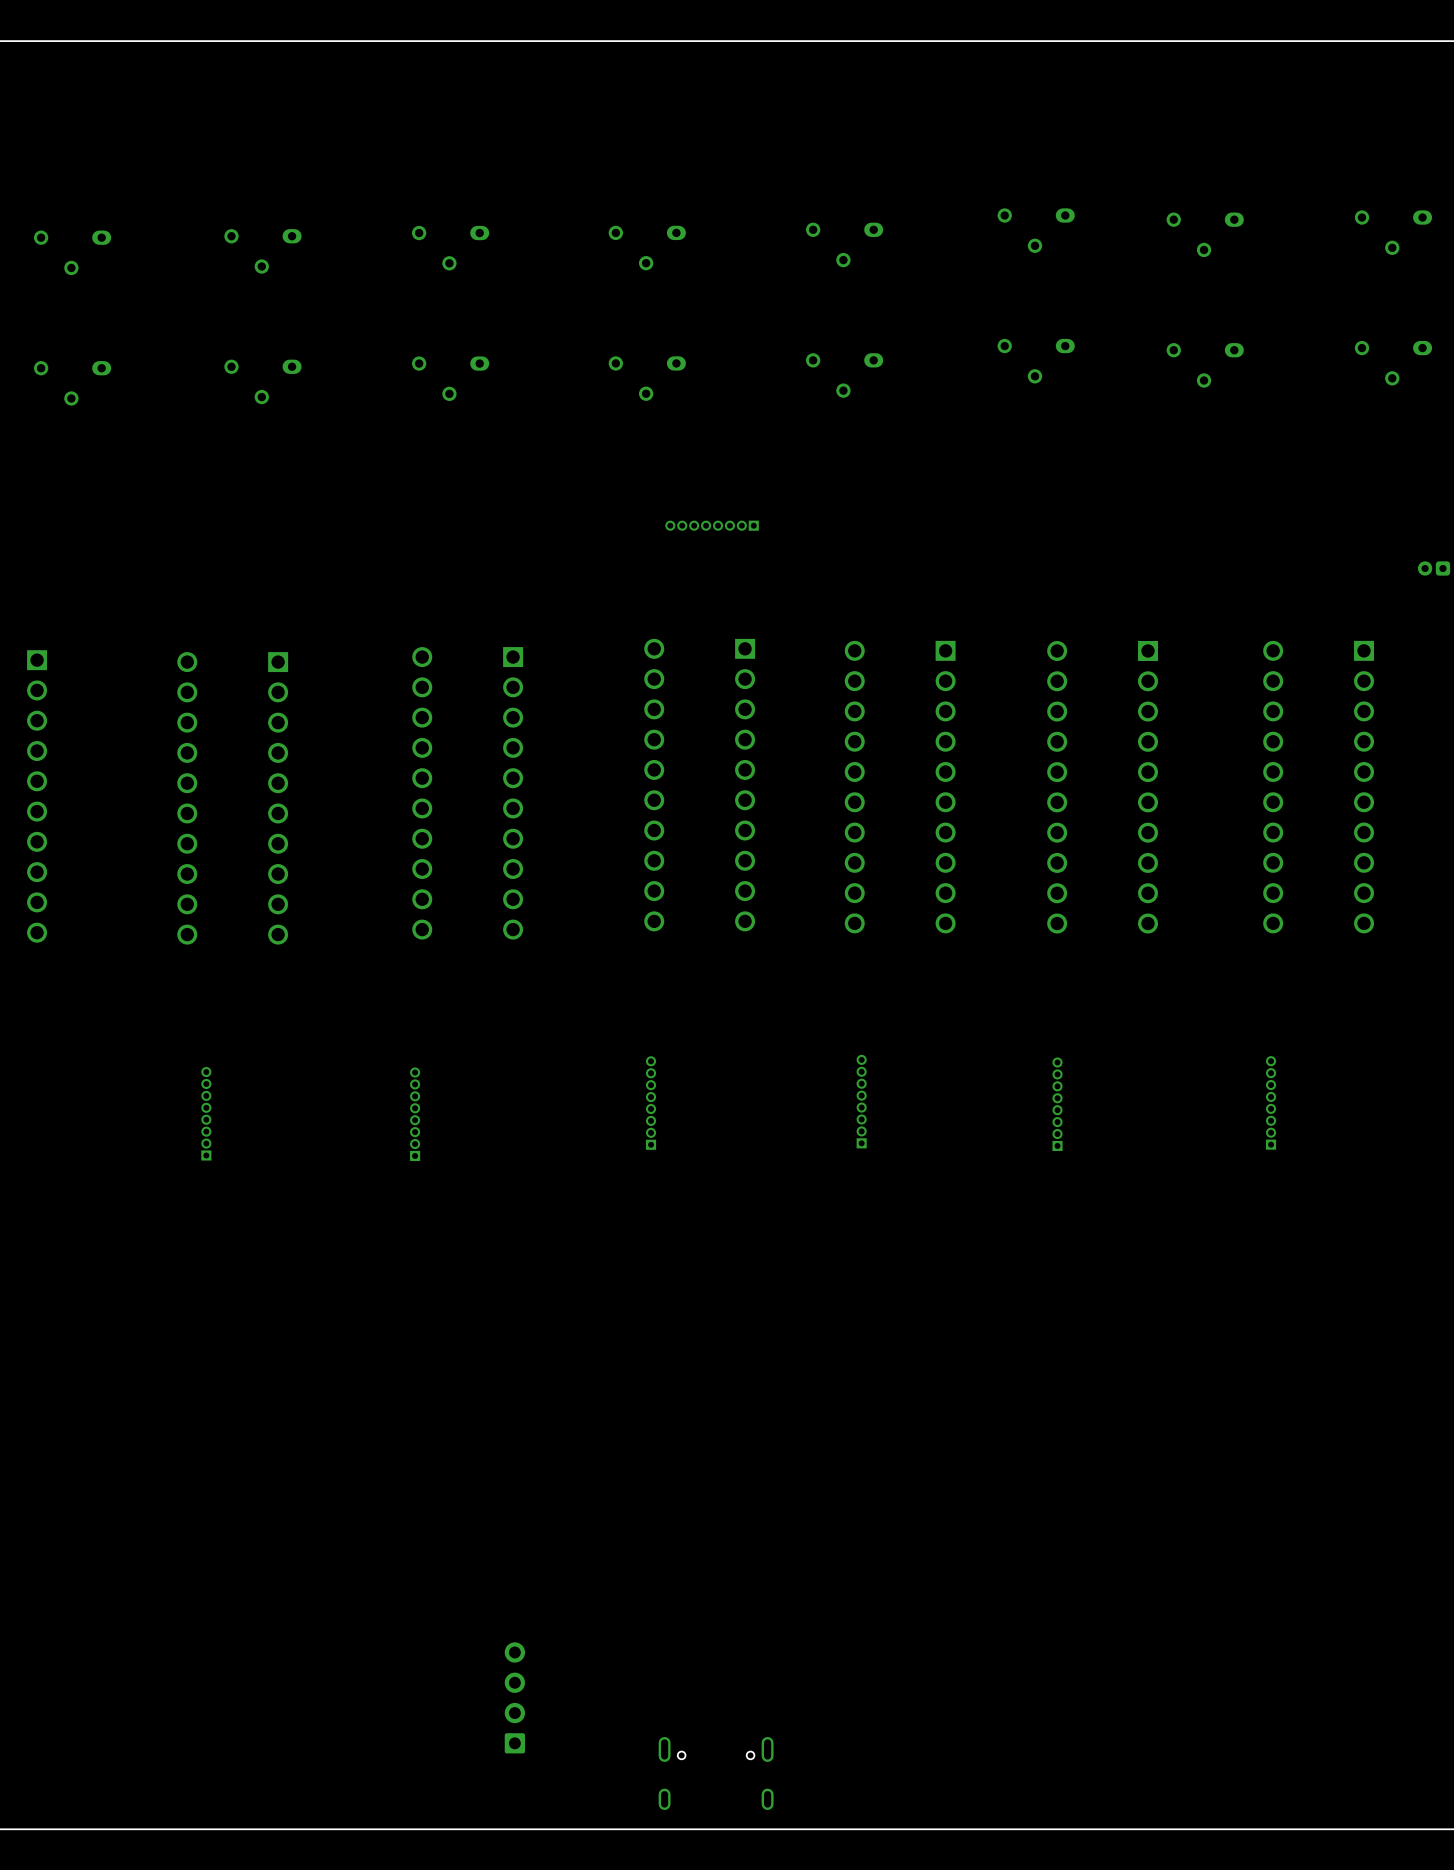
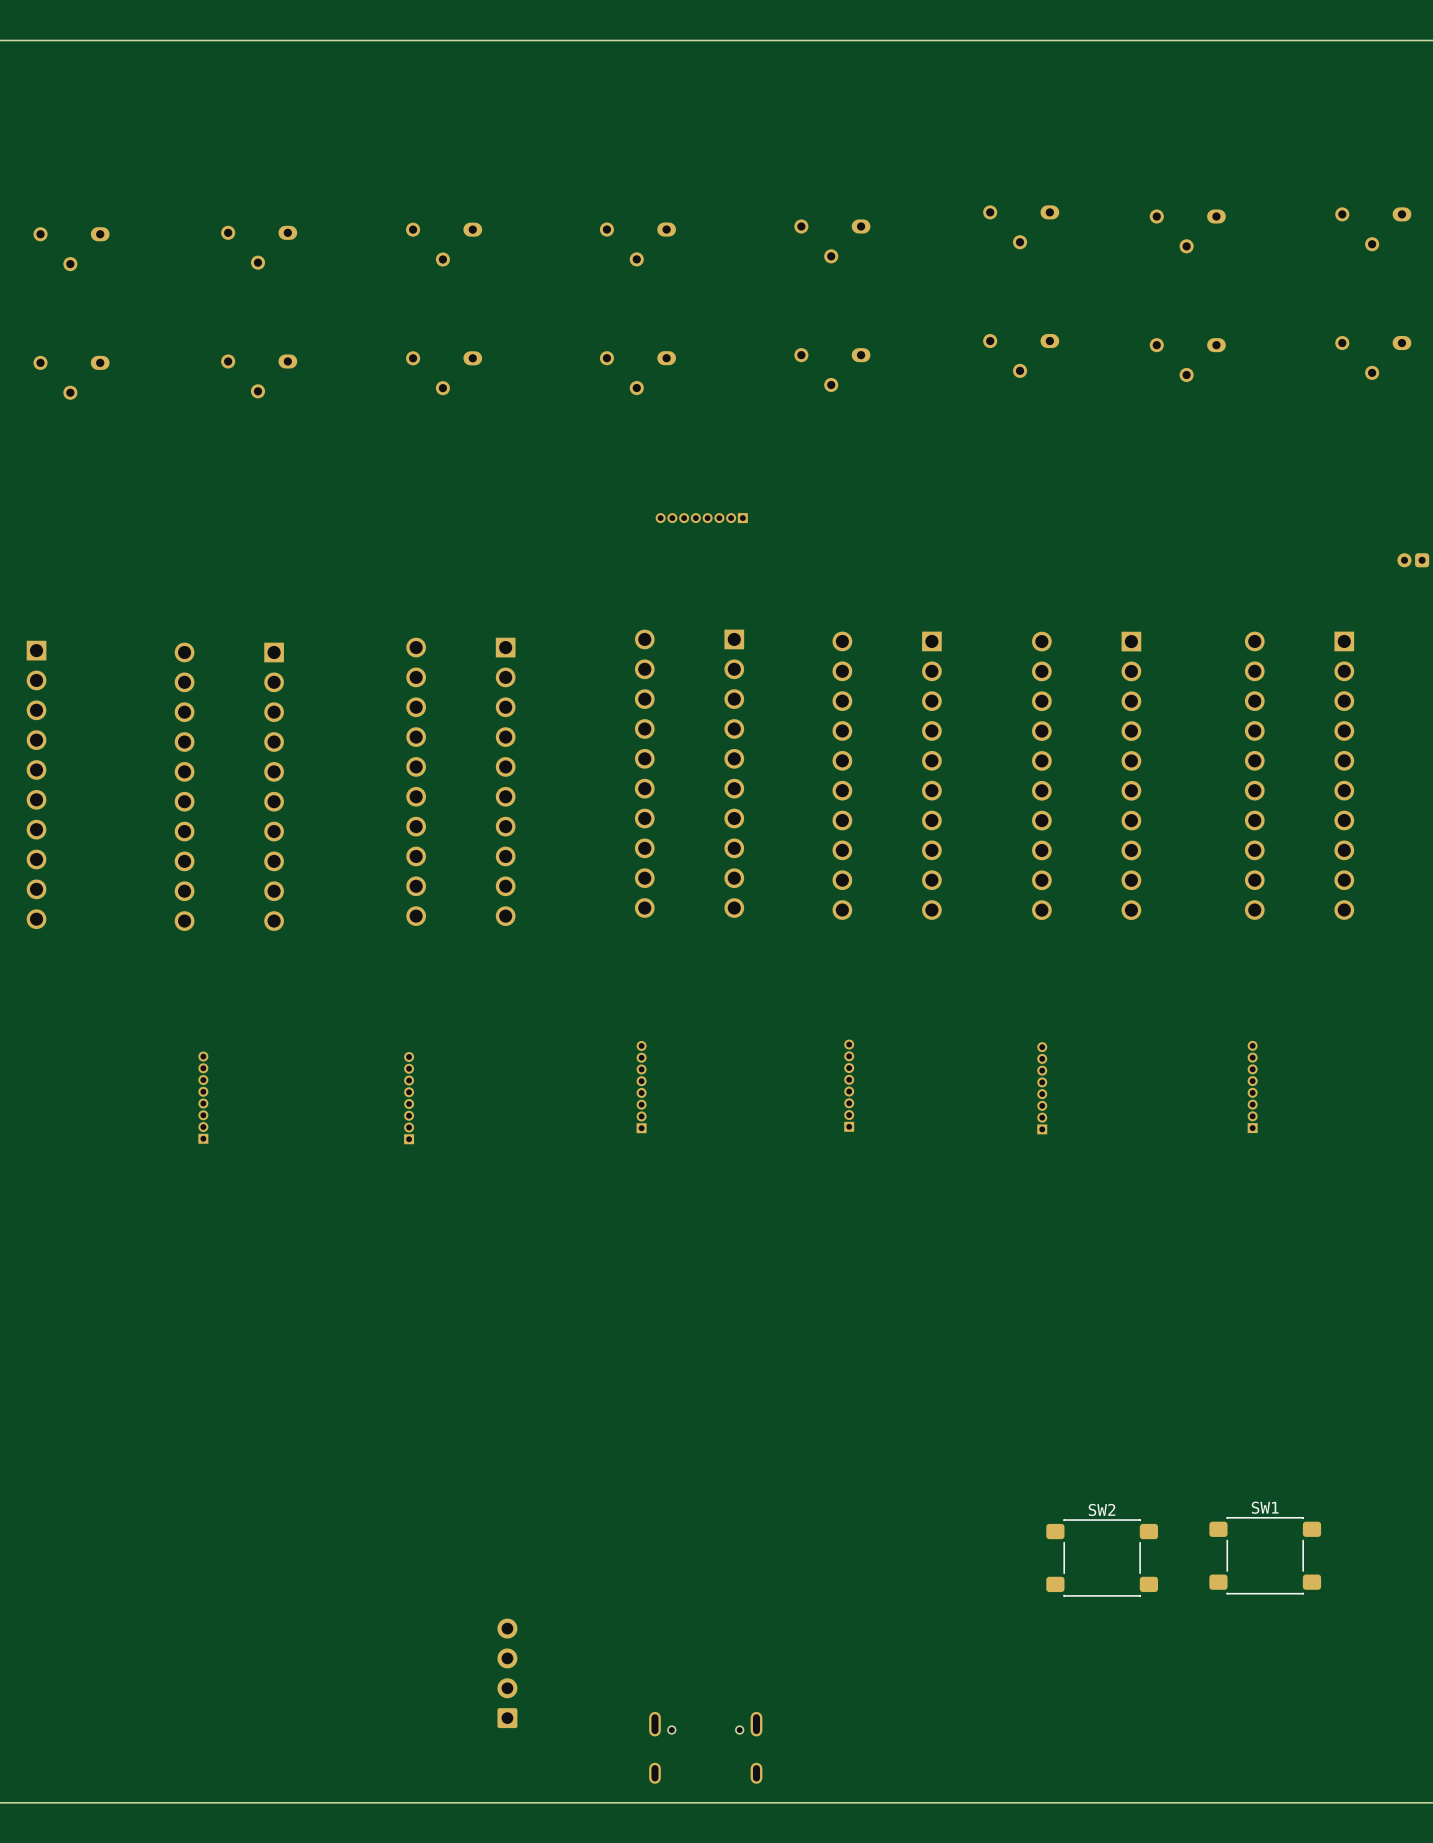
SW1: none -> (1265, 1555)
SW2: none -> (1102, 1557)

